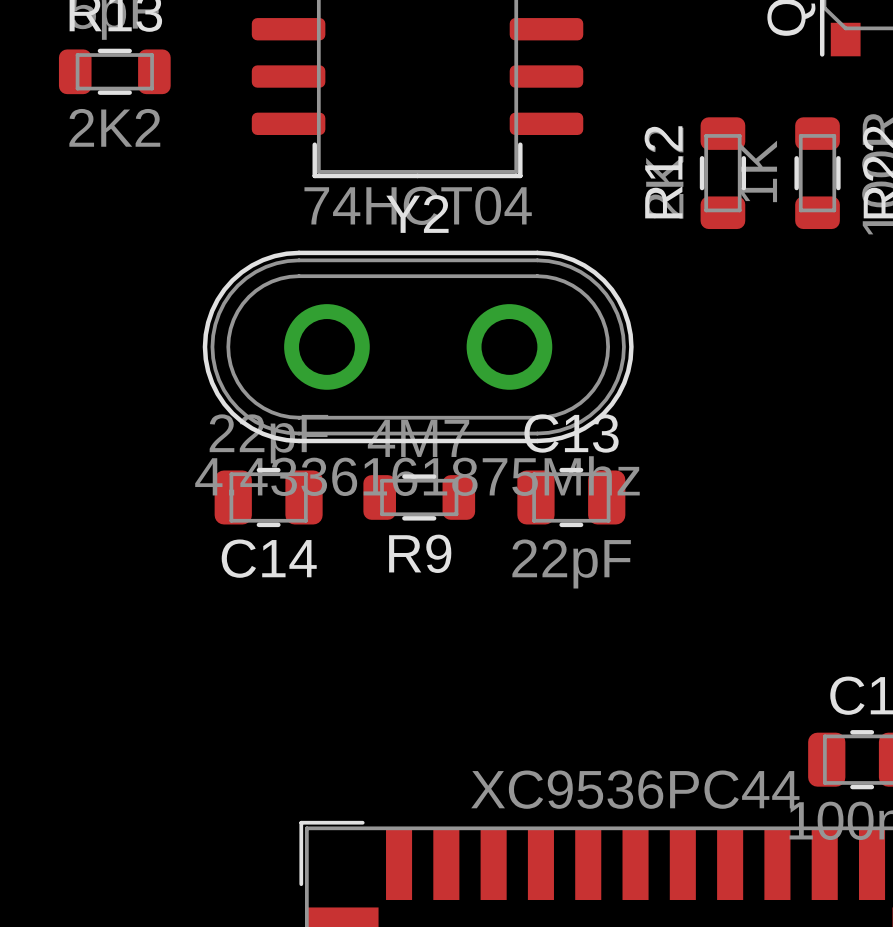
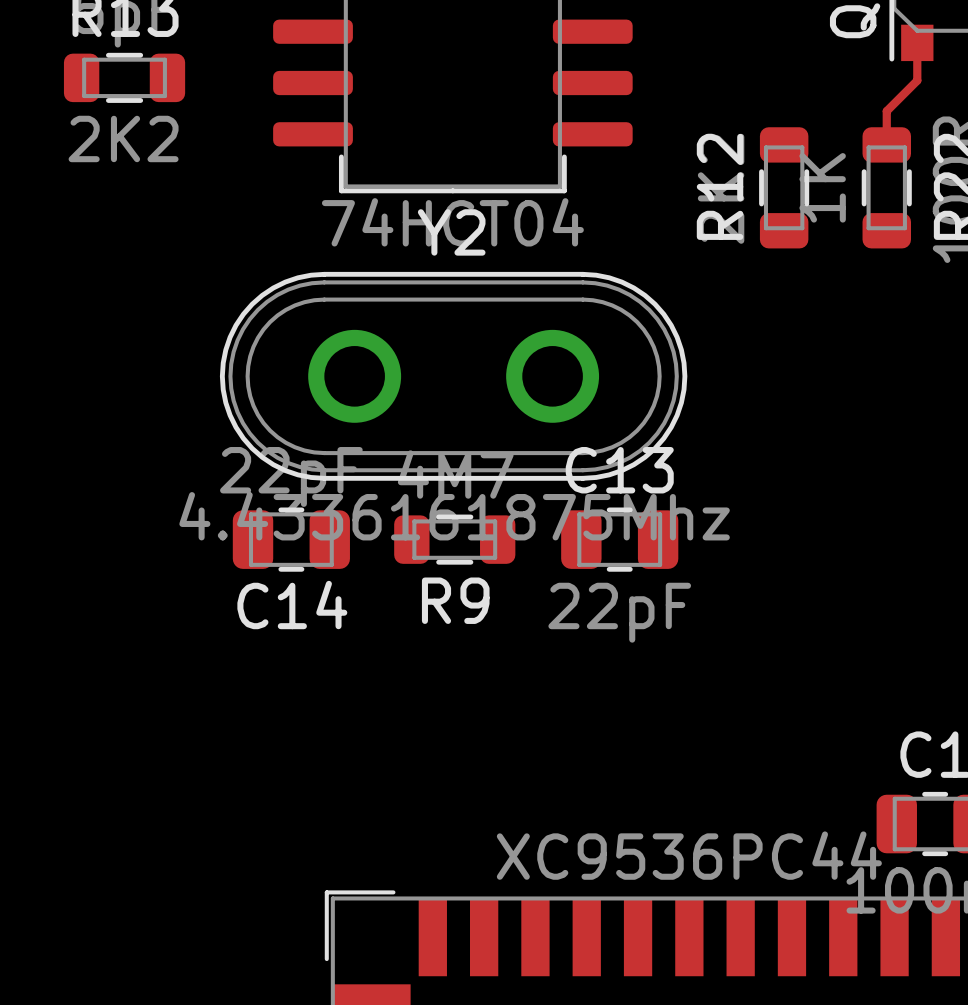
track: none -> (917, 42) (917, 80) (886, 111) (886, 144)

